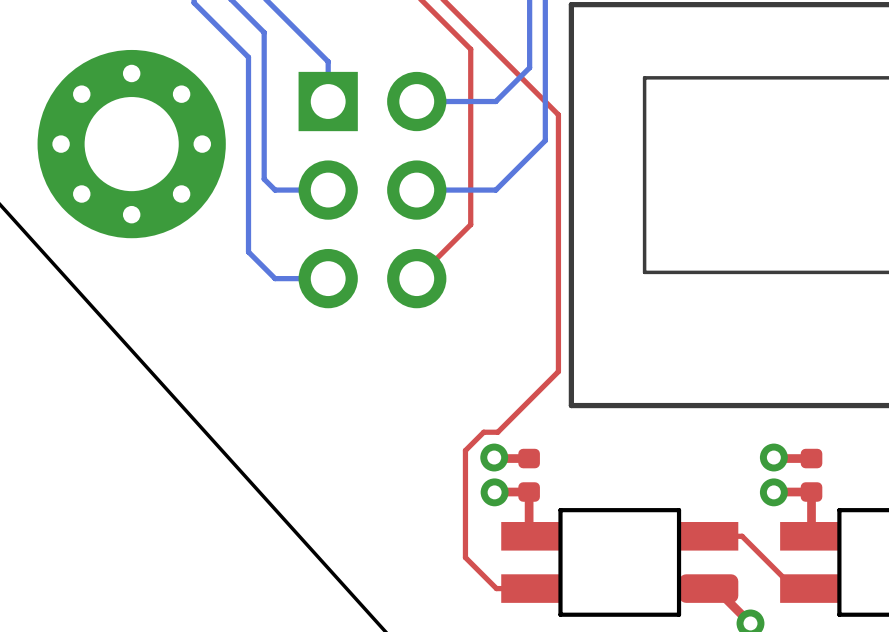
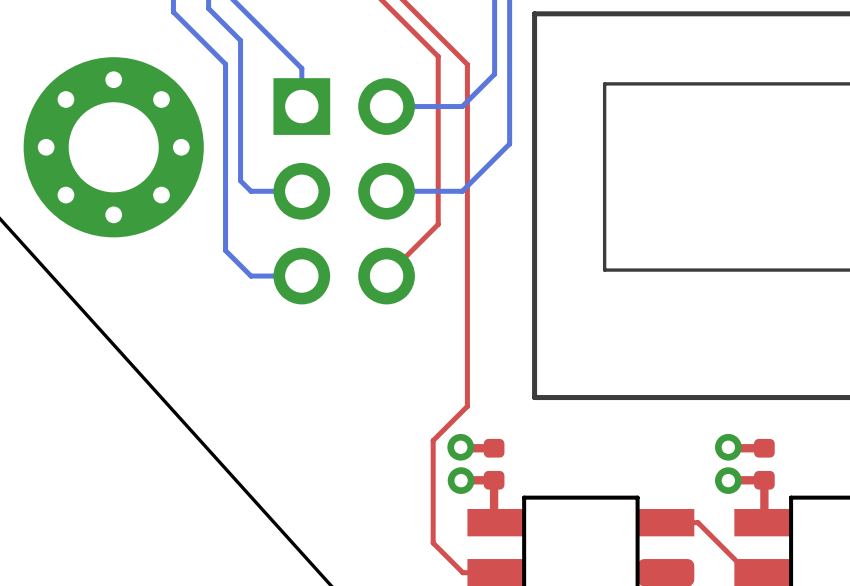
top track: (501, 57) (558, 114) (558, 371) (497, 432) (483, 432) -> (467, 64) (467, 406) (450, 423)

